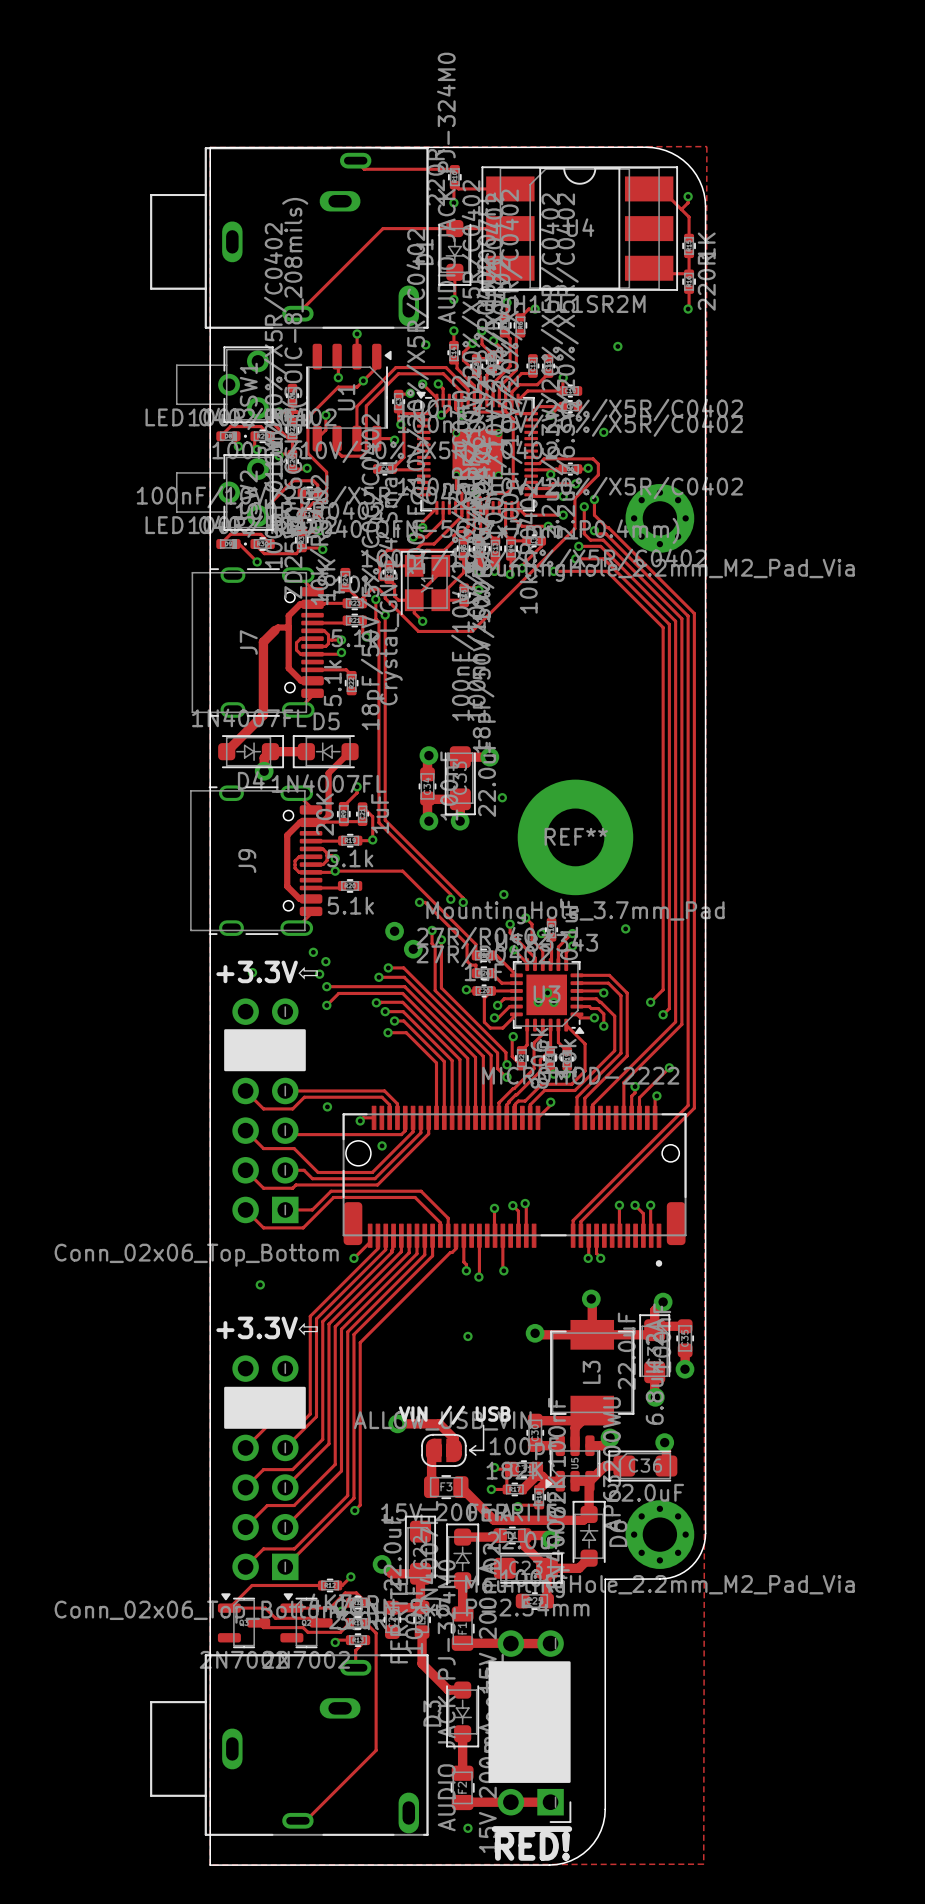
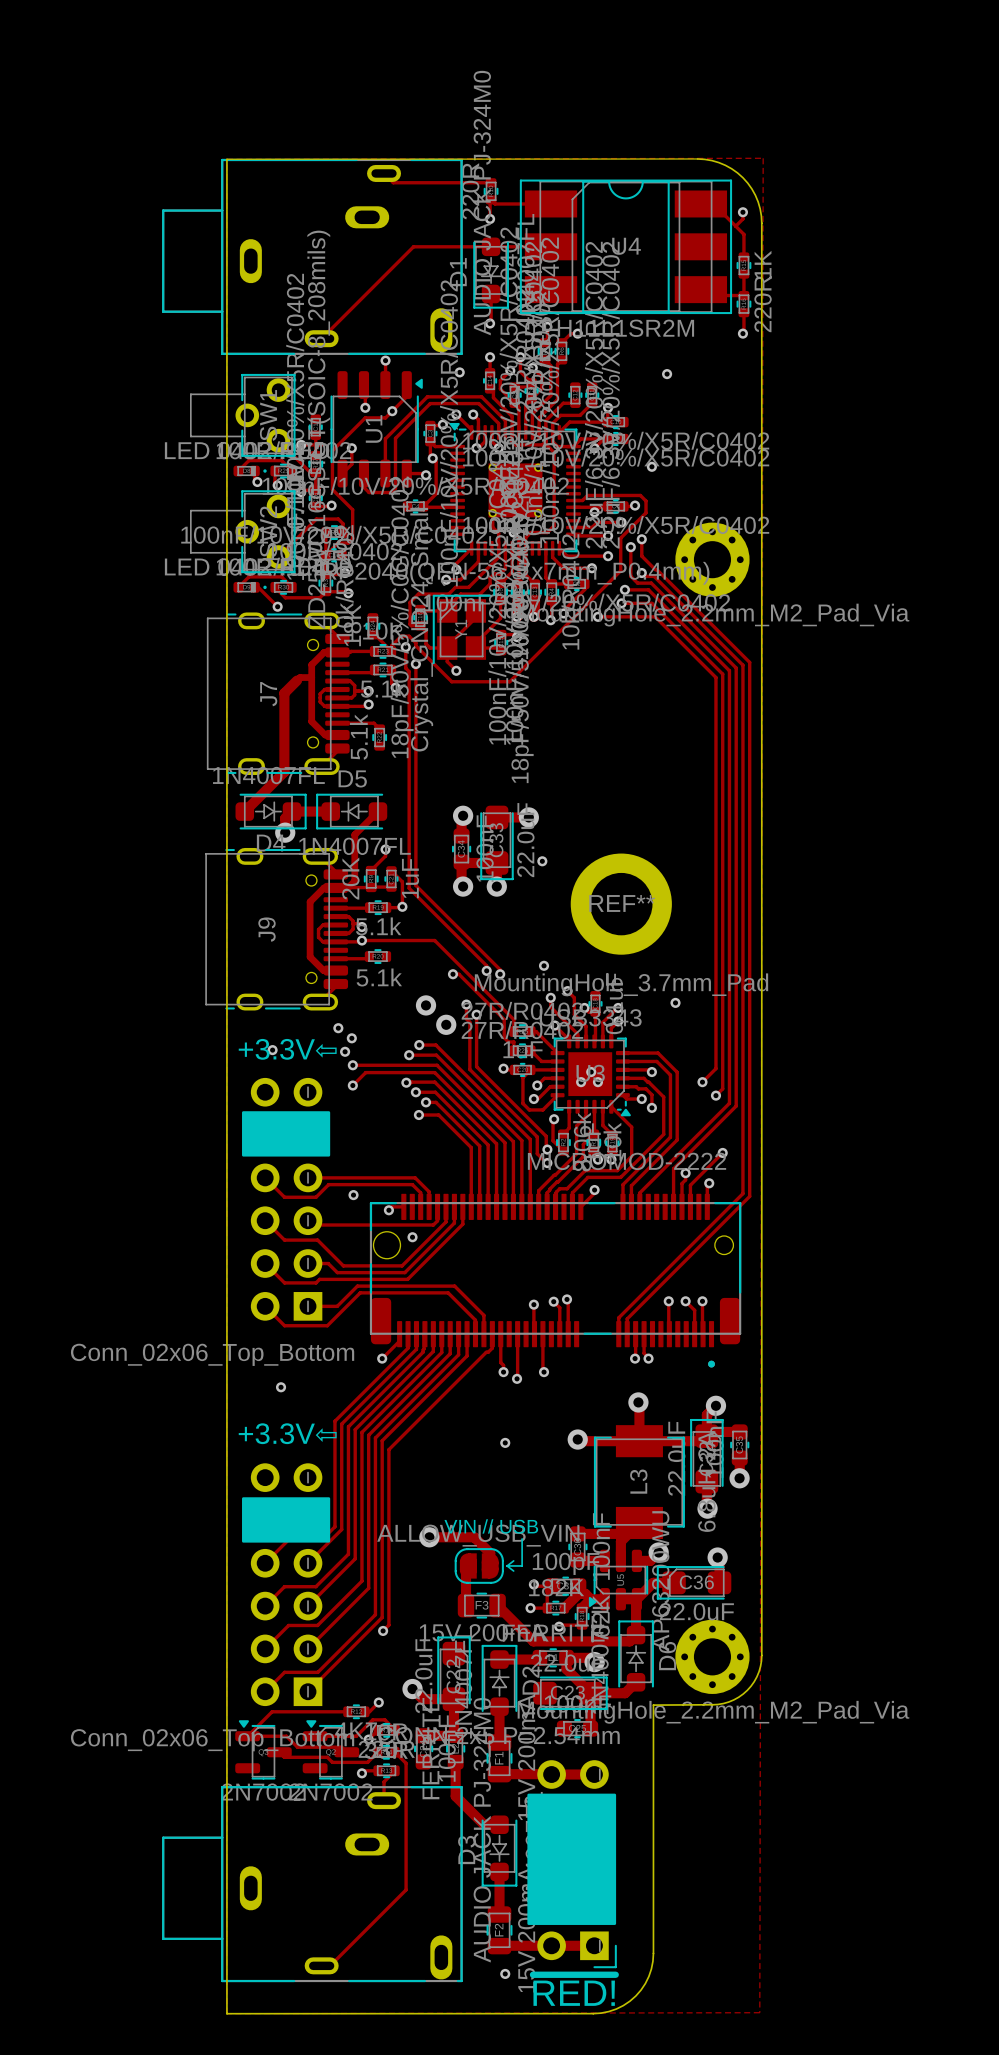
REF** footprint: [517, 779, 634, 896] -> [570, 853, 672, 955]

